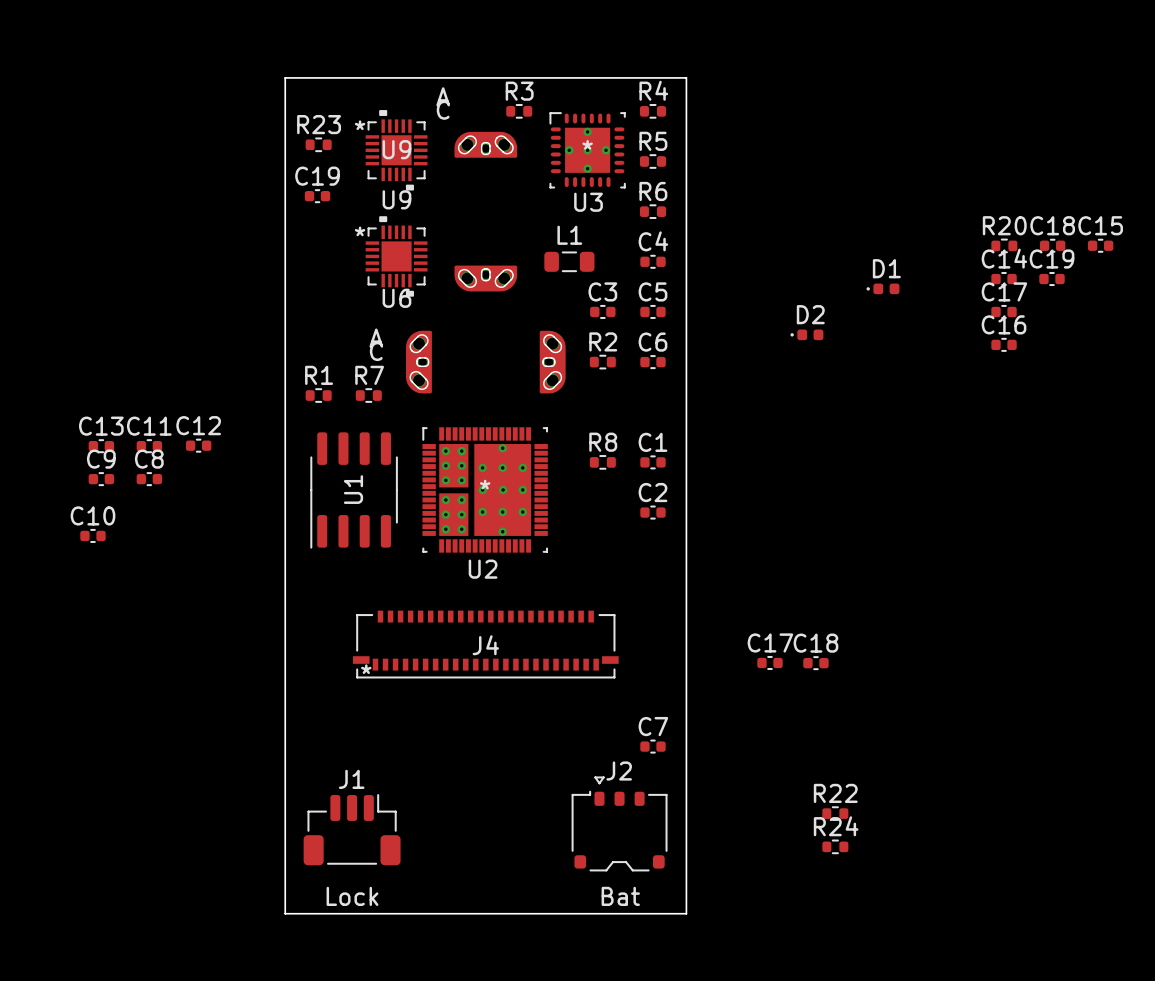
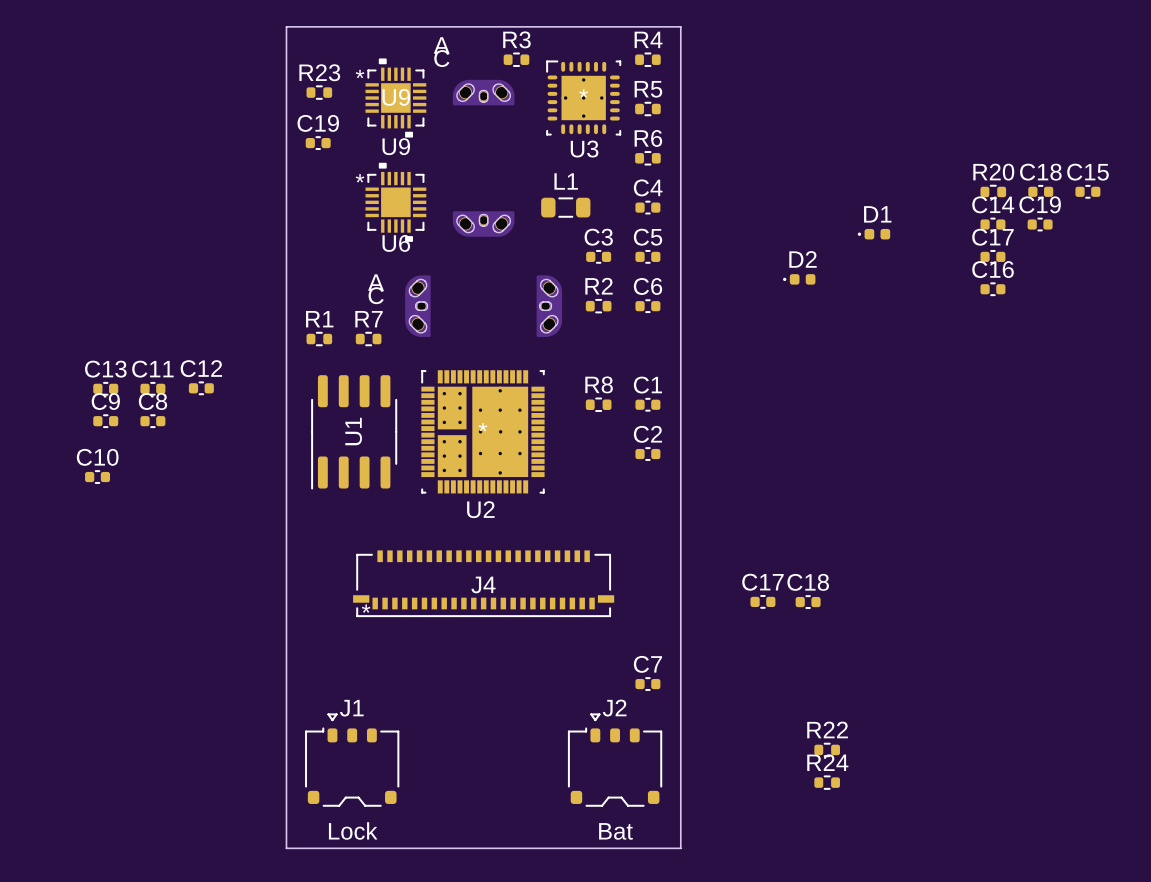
J1 footprint: [303, 794, 401, 866] -> [305, 713, 400, 807]

